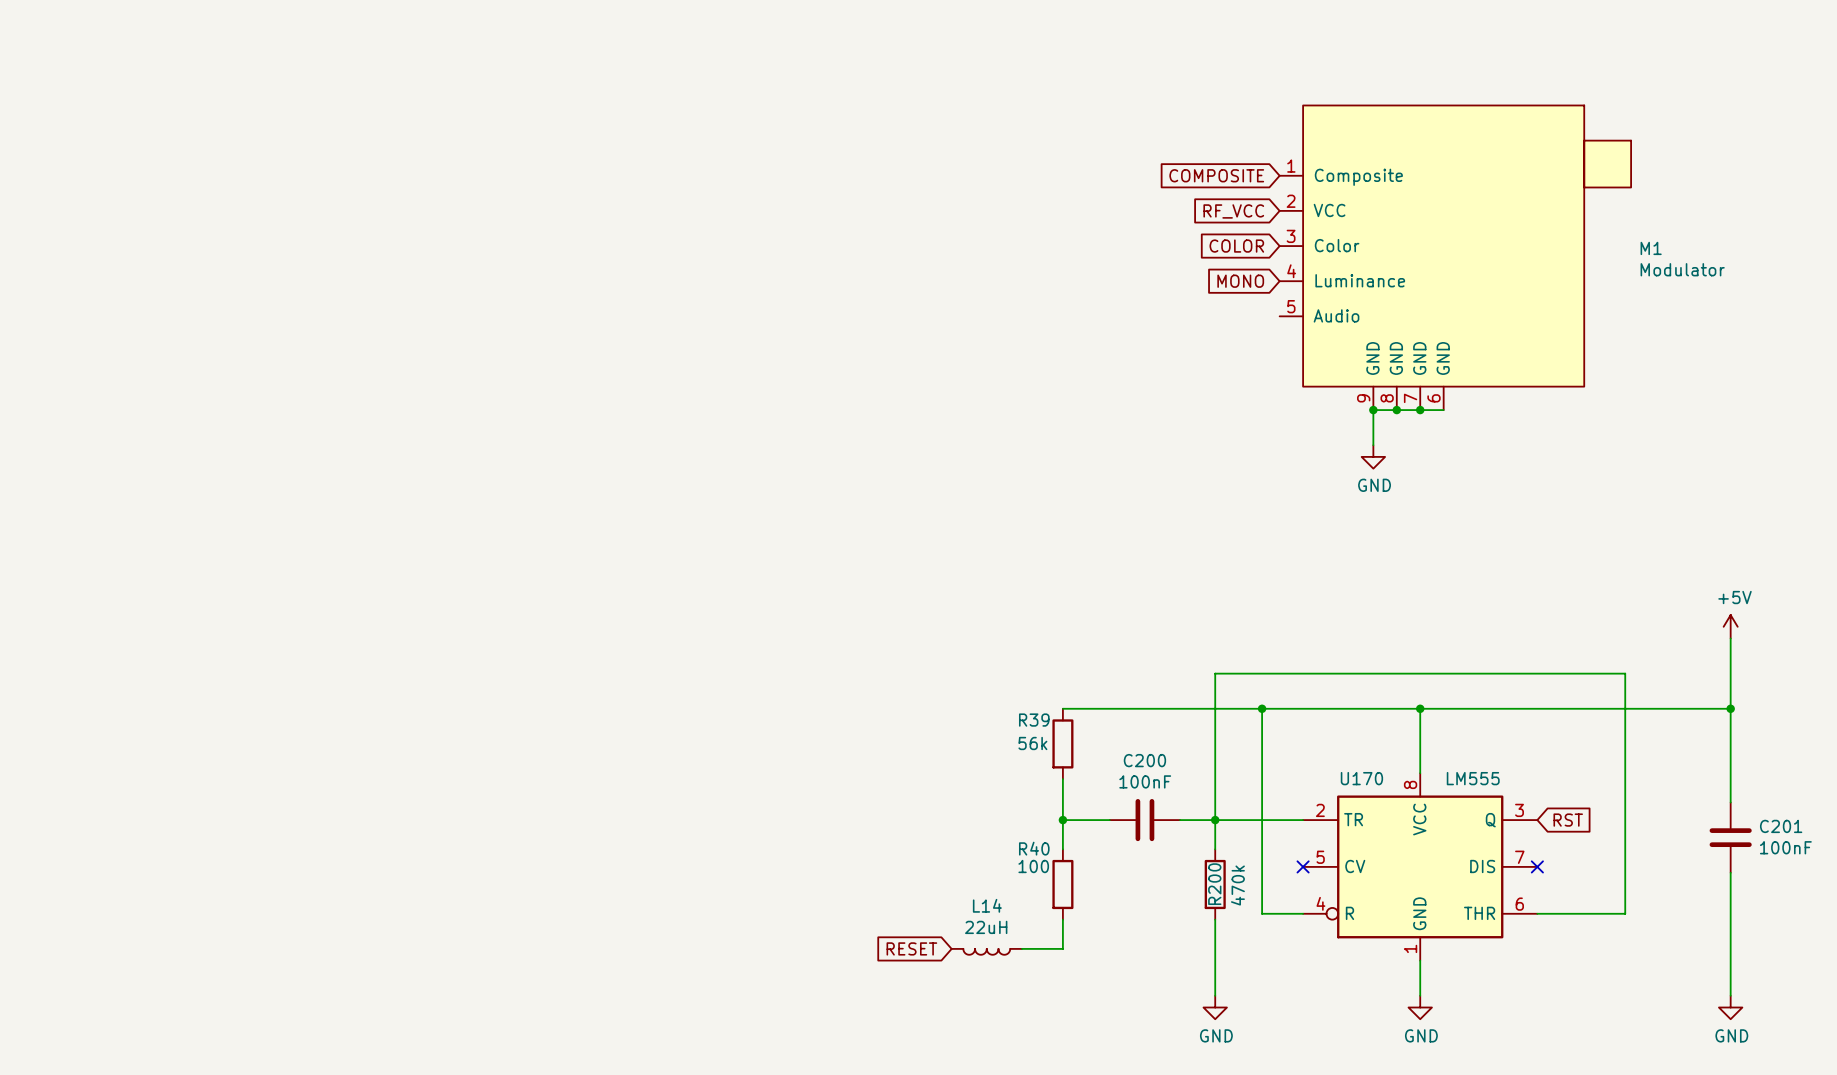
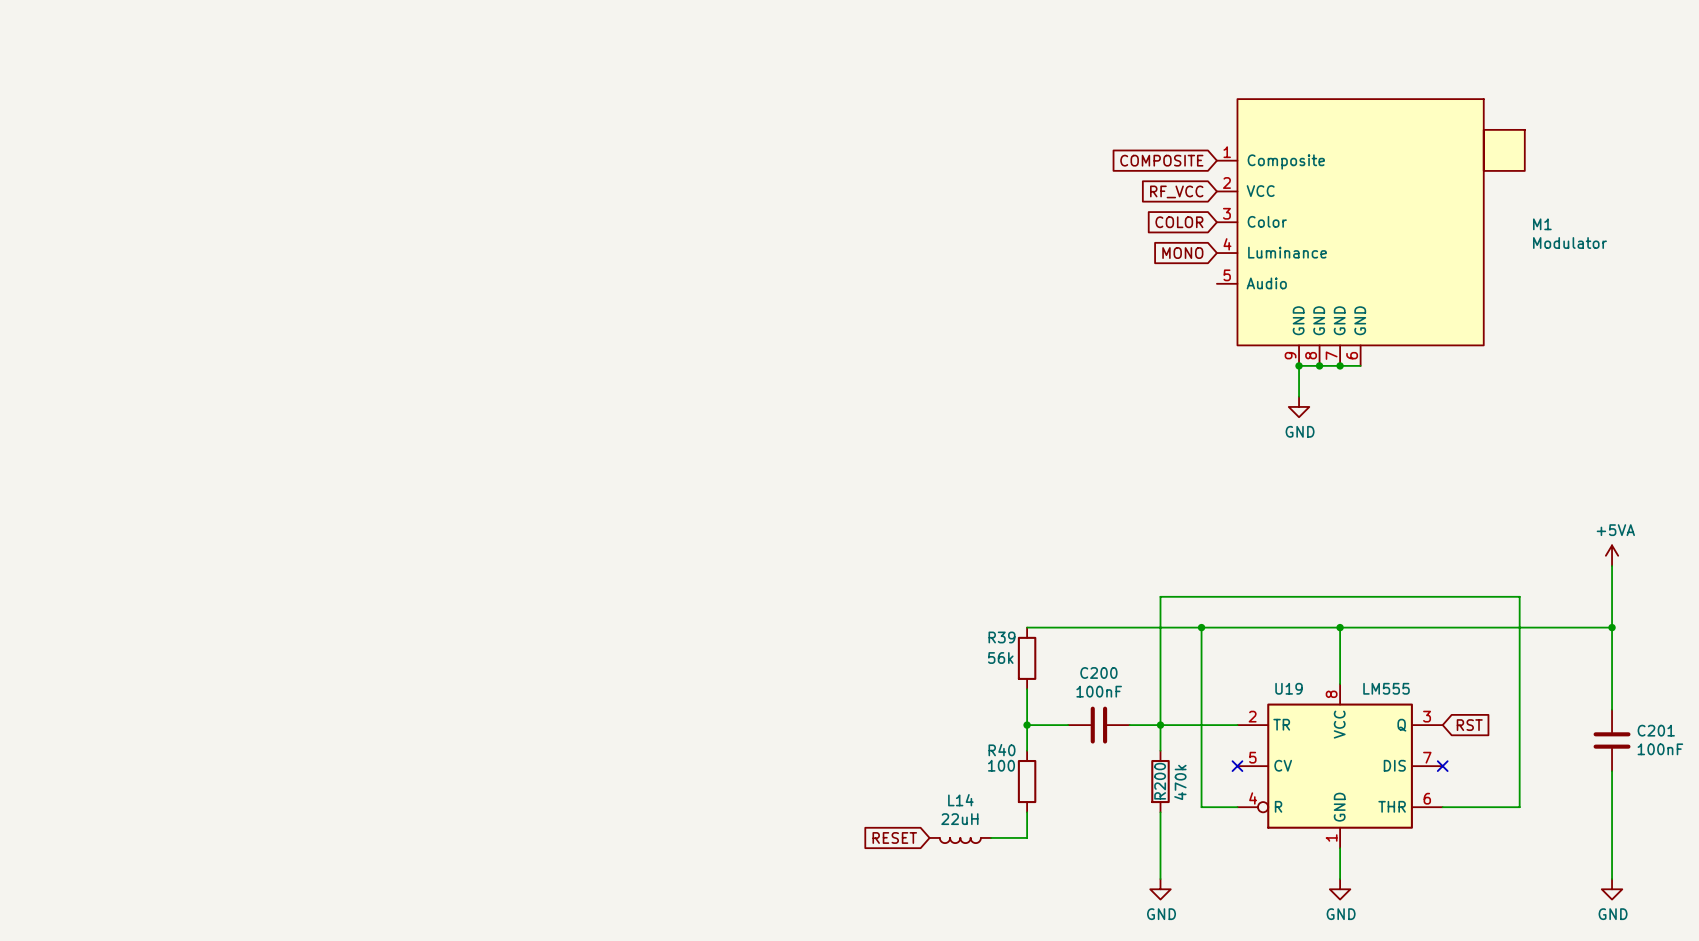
power symbol: +5V (1730, 626) -> +5VA (1612, 555)
U170 name: U170 (1361, 778) -> U19 (1289, 688)

